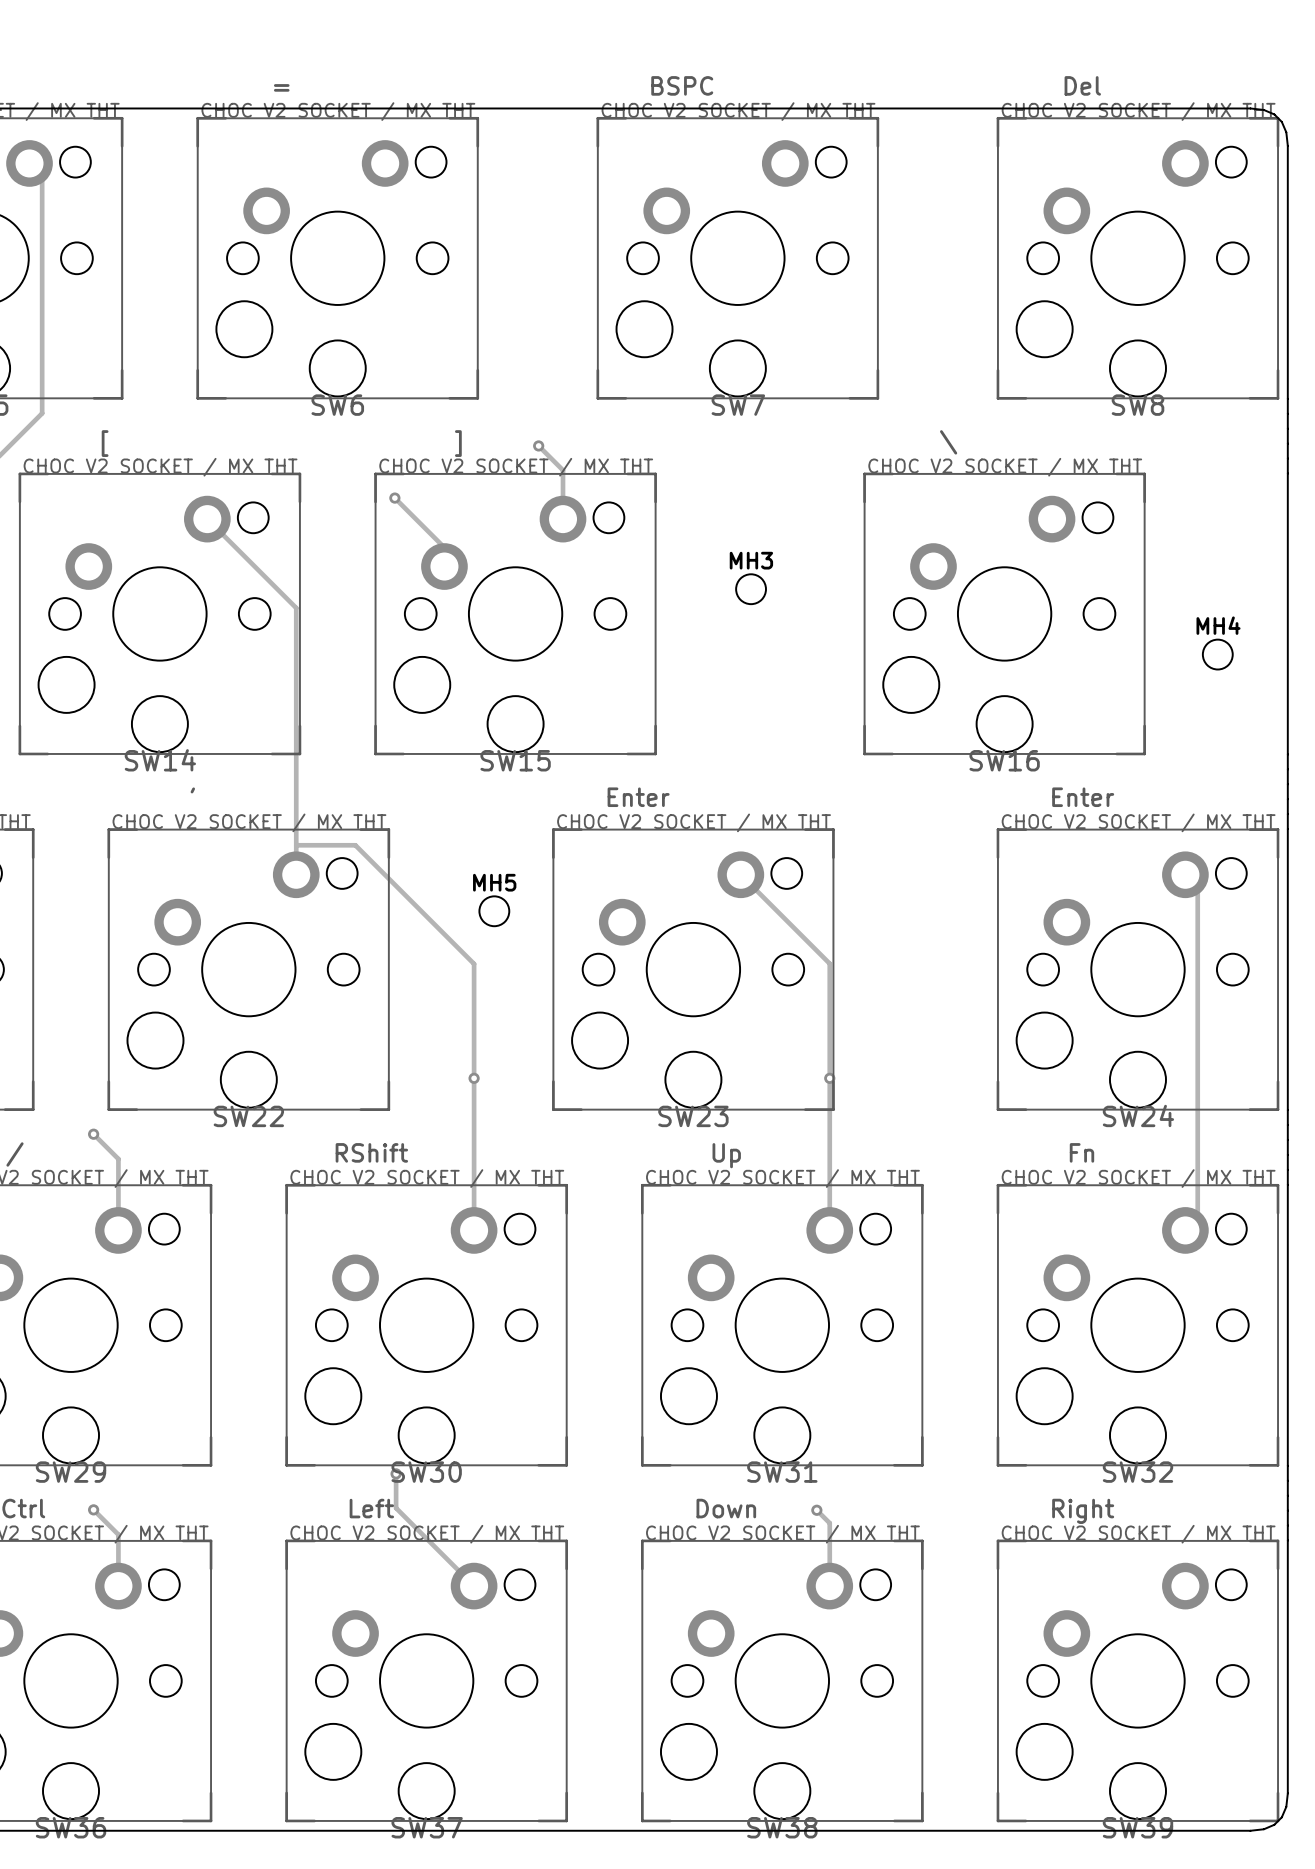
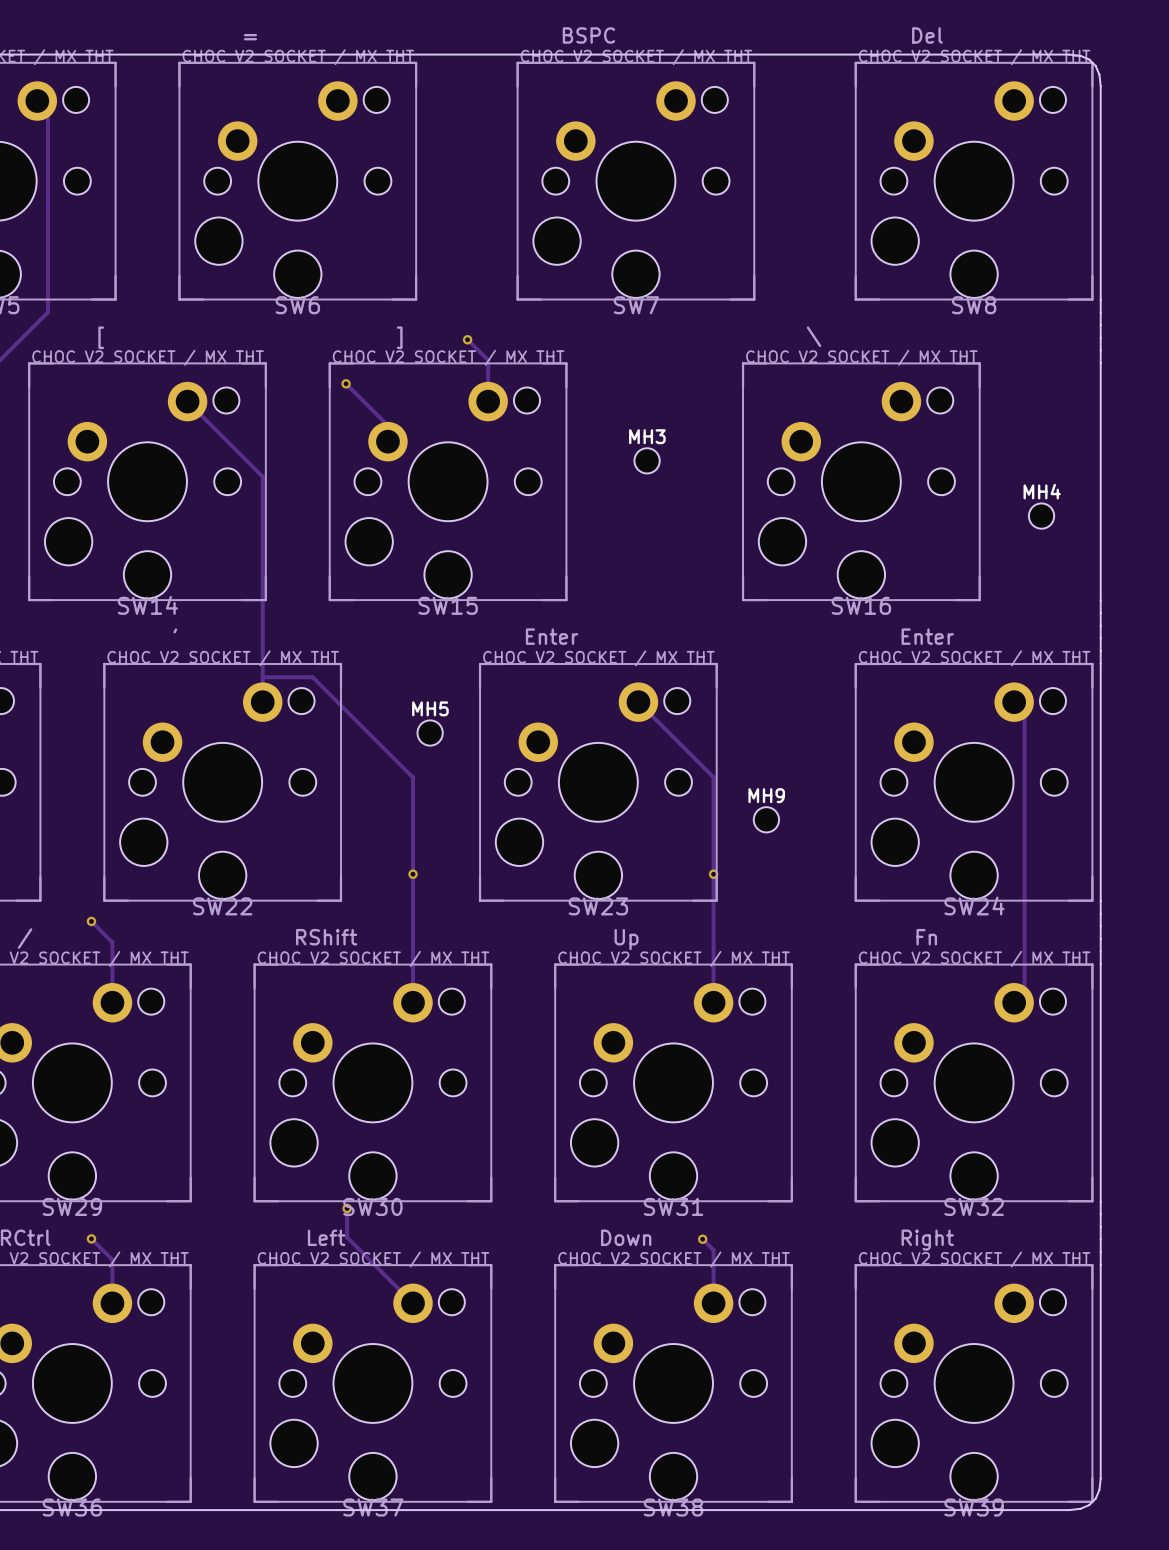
MH9: none -> (766, 819)

